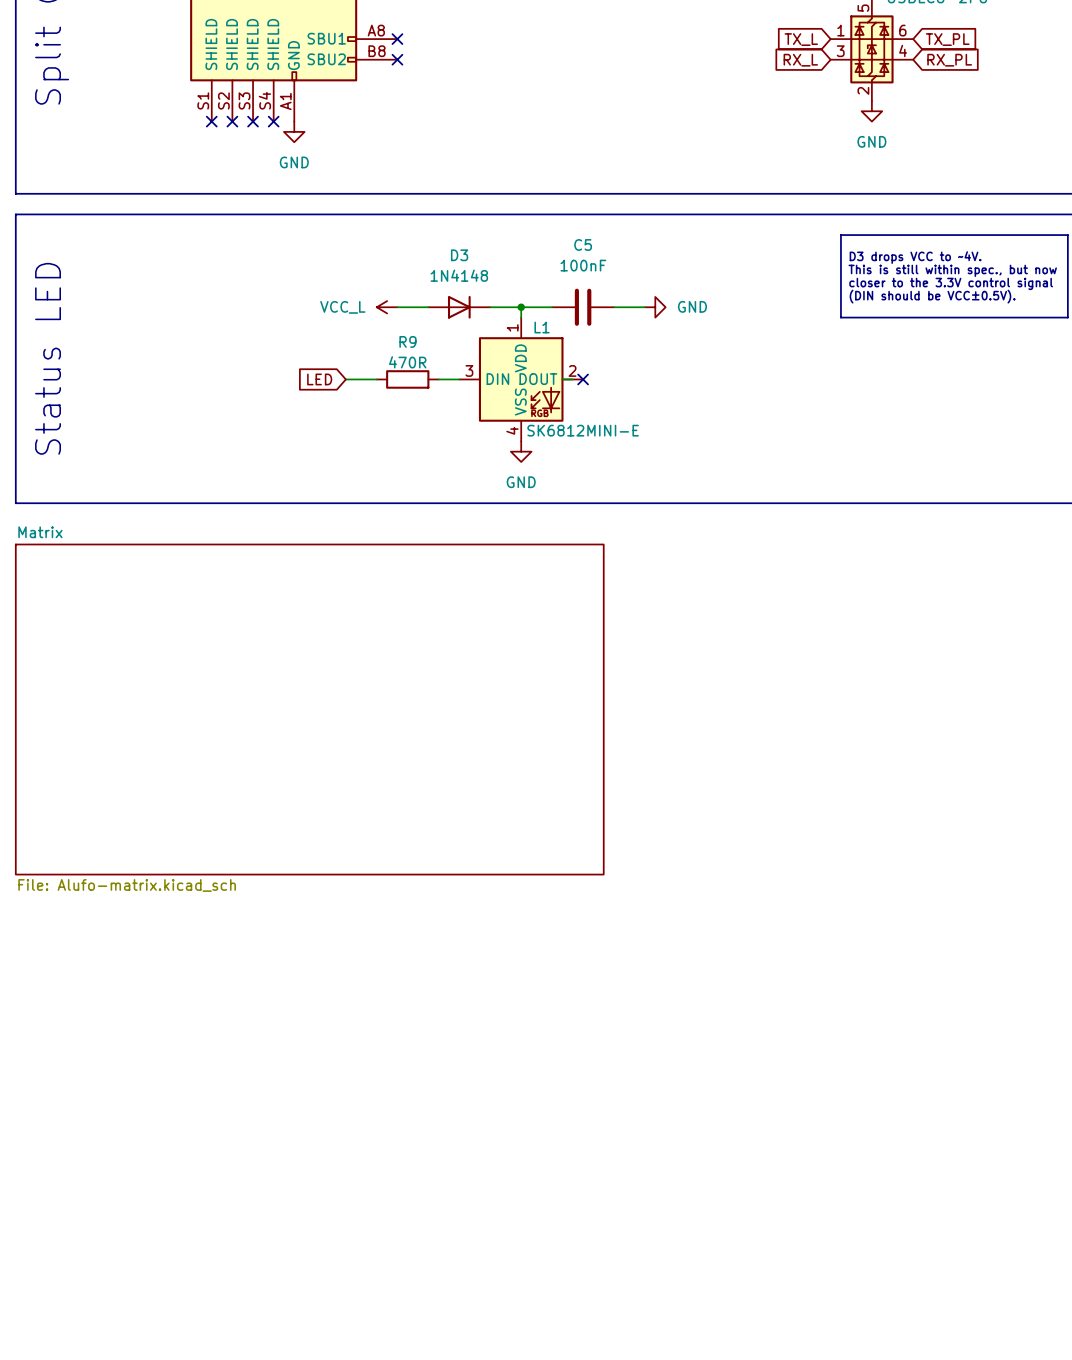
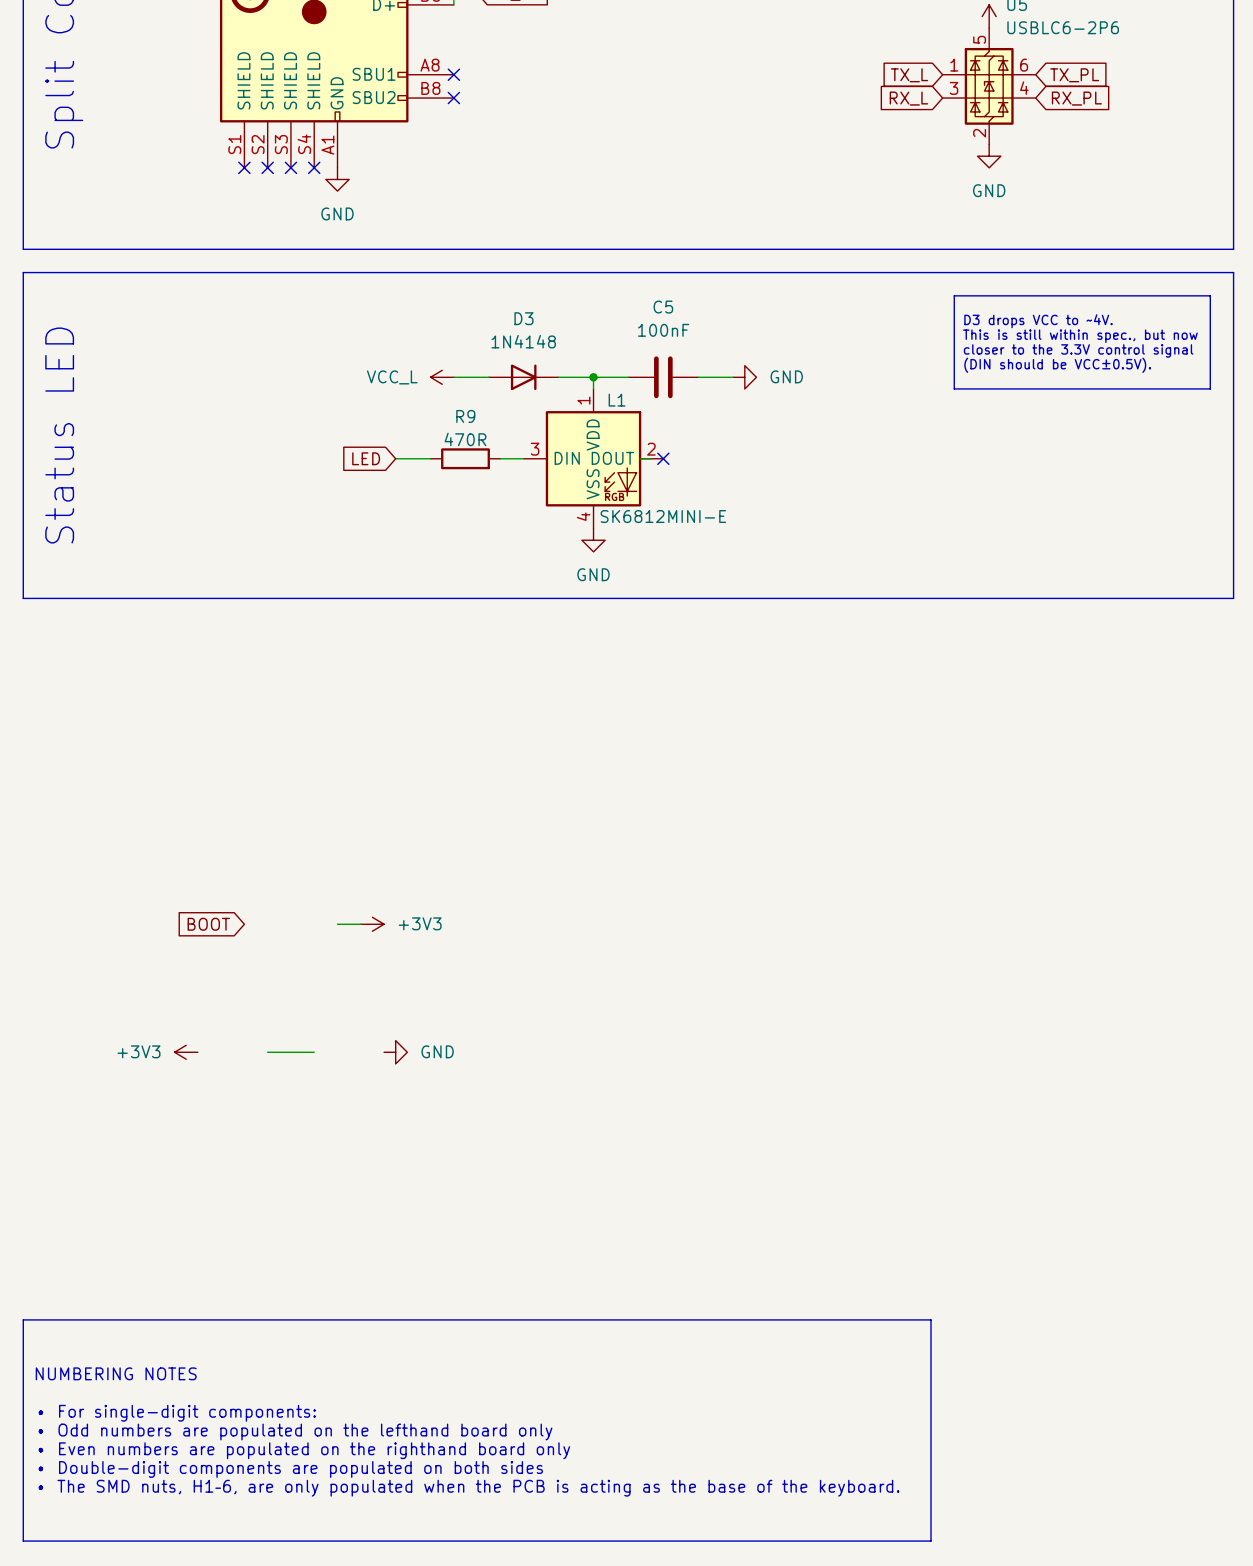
sheet Matrix: File: Alufo-matrix.kicad_sch (309, 709) -> none
global label: none -> BOOT (208, 924)
wire: none -> (337, 924) (360, 924)
power symbol: none -> +3V3 (372, 924)
power symbol: none -> +3V3 (186, 1052)
wire: none -> (267, 1052) (314, 1052)
power symbol: none -> GND (395, 1052)
line: none -> (23, 1319) (23, 1541) (931, 1541) (931, 1319) (23, 1319)
text: none -> NUMBERING NOTES (116, 1373)
text: none -> • For single-digit components: (177, 1413)
text: none -> • Odd numbers are populated on the lefthand board only (295, 1431)
text: none -> • Even numbers are populated on the righthand board only (304, 1450)
text: none -> • Double-digit components are populated on both sides (290, 1469)
text: none -> • The SMD nuts, H1–6, are only populated when the PCB is acting as the base of the keyboard. (468, 1488)

